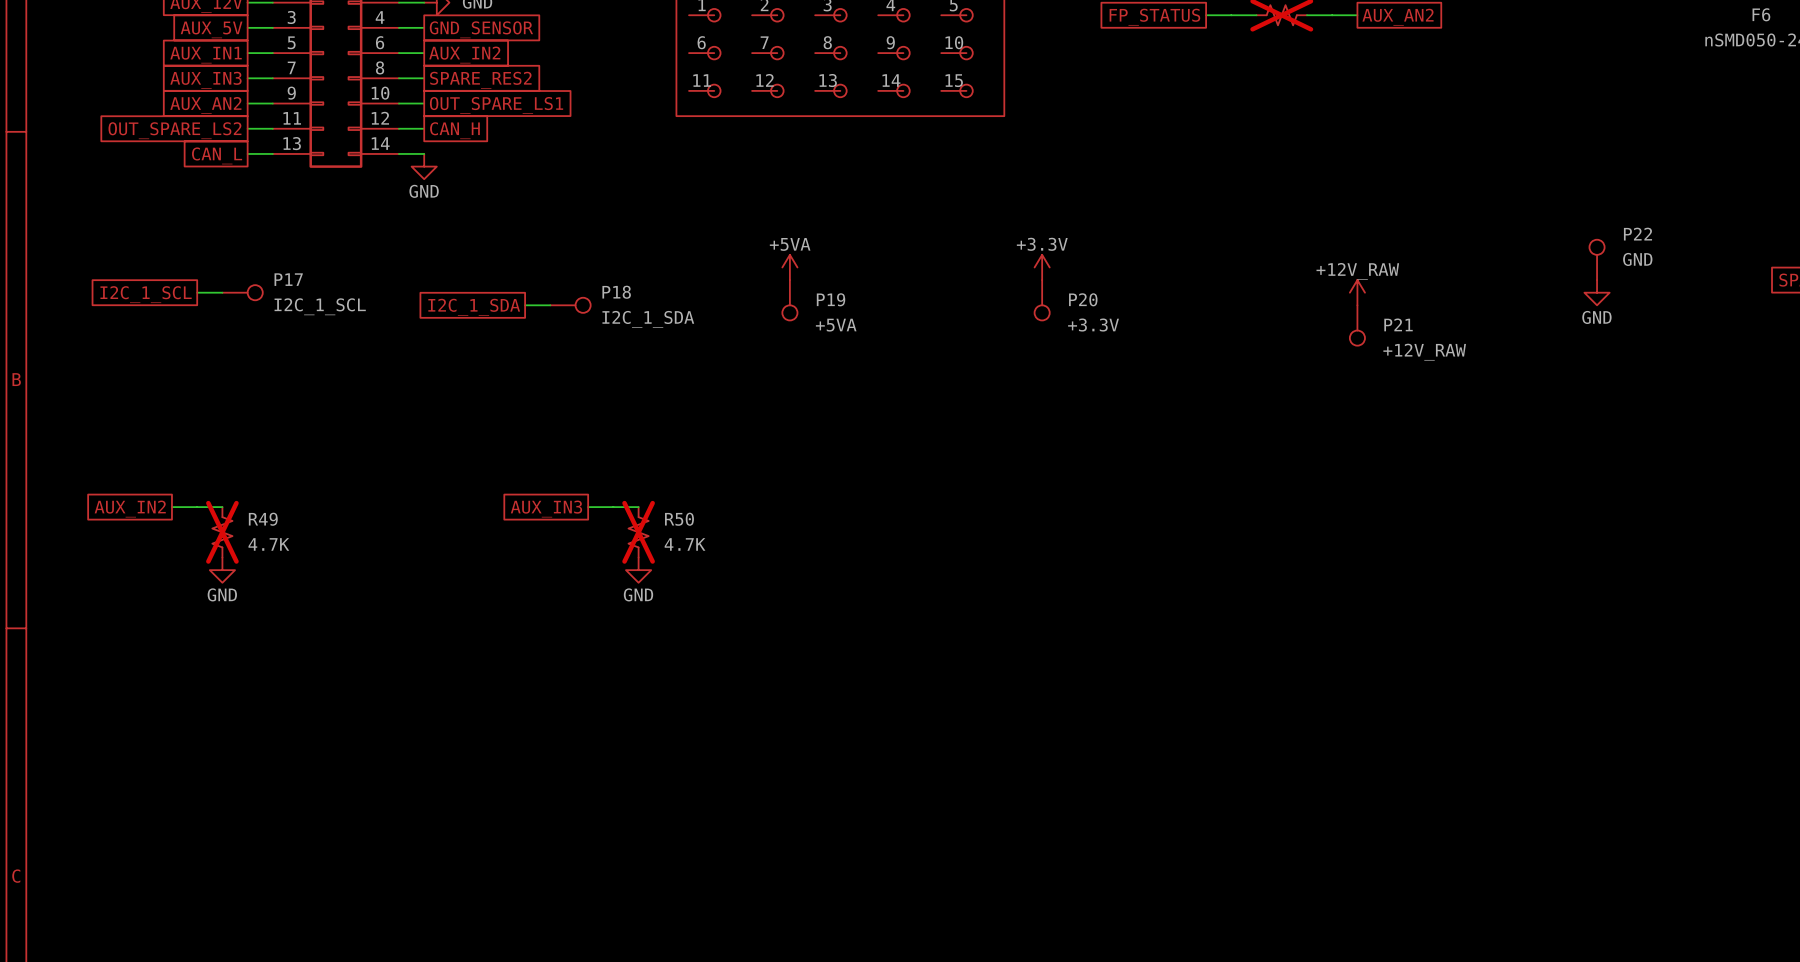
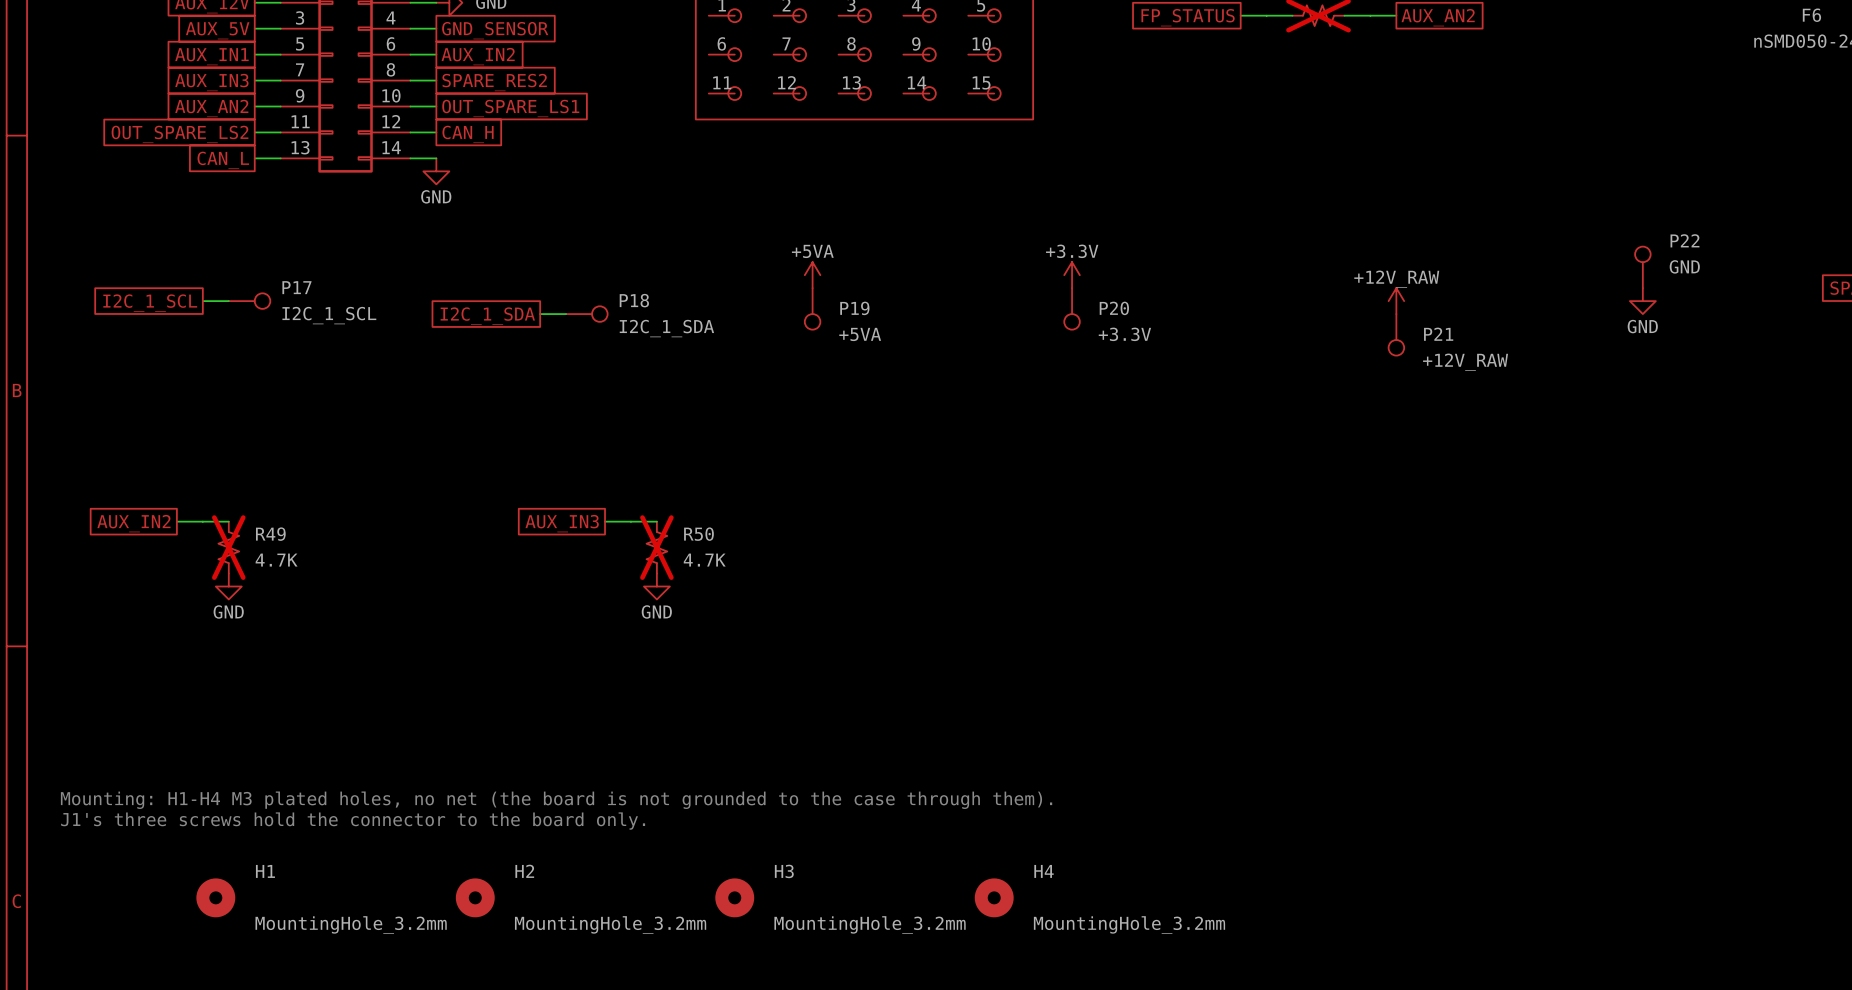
text: none -> Mounting: H1-H4 M3 plated holes, no net (the board is not grounded to the case through them). (556, 800)
text: none -> J1's three screws hold the connector to the board only. (353, 821)
H1: none -> MountingHole_3.2mm (215, 897)
H2: none -> MountingHole_3.2mm (475, 897)
H3: none -> MountingHole_3.2mm (734, 897)
H4: none -> MountingHole_3.2mm (994, 897)

